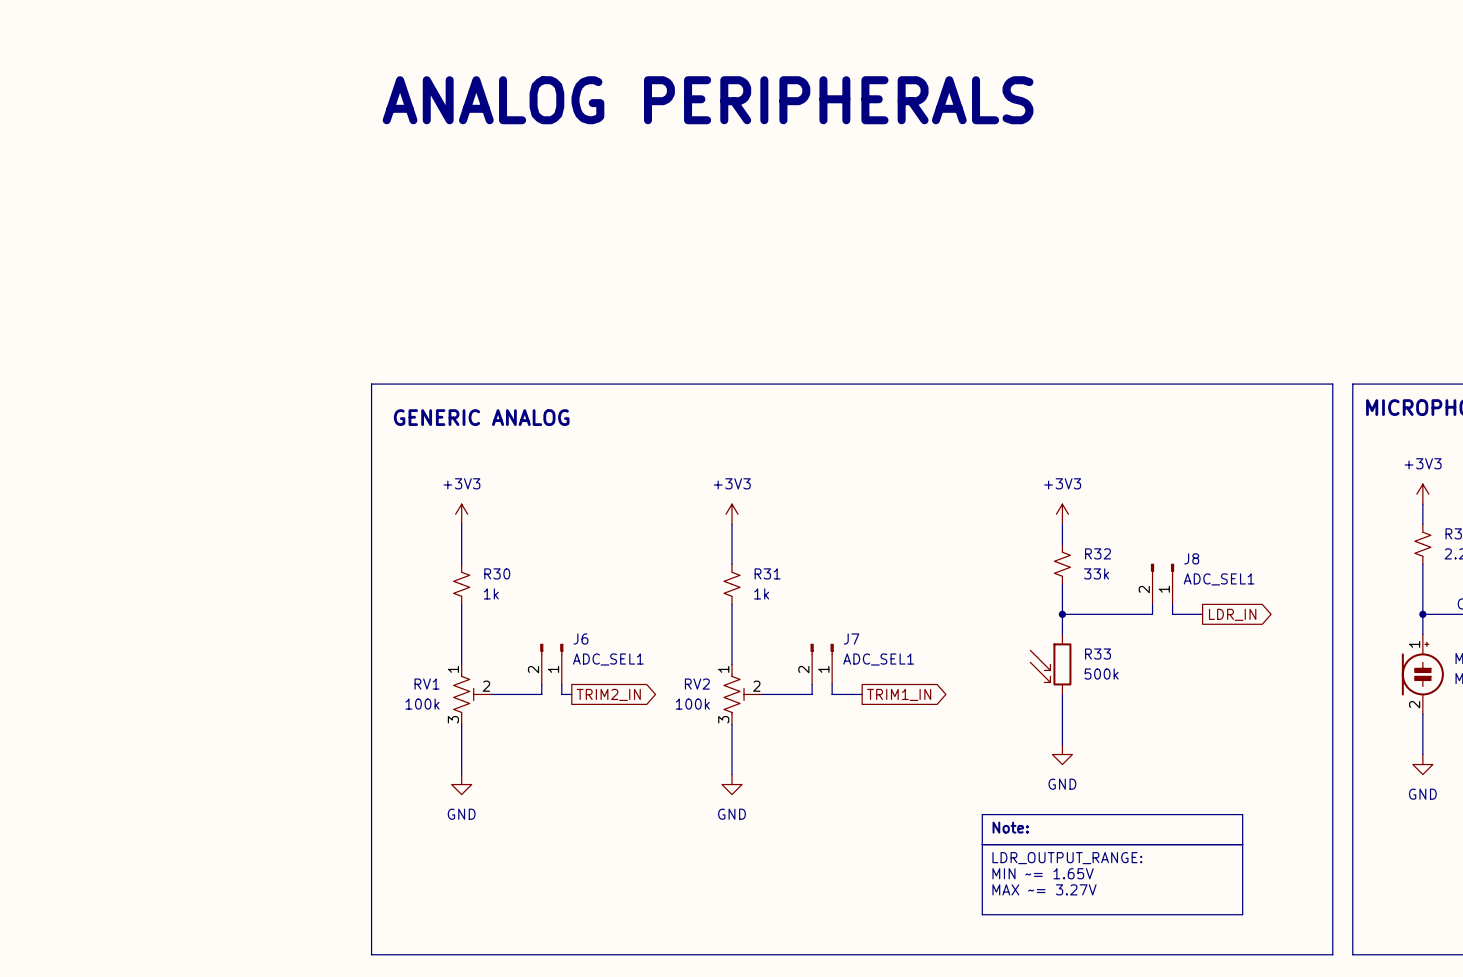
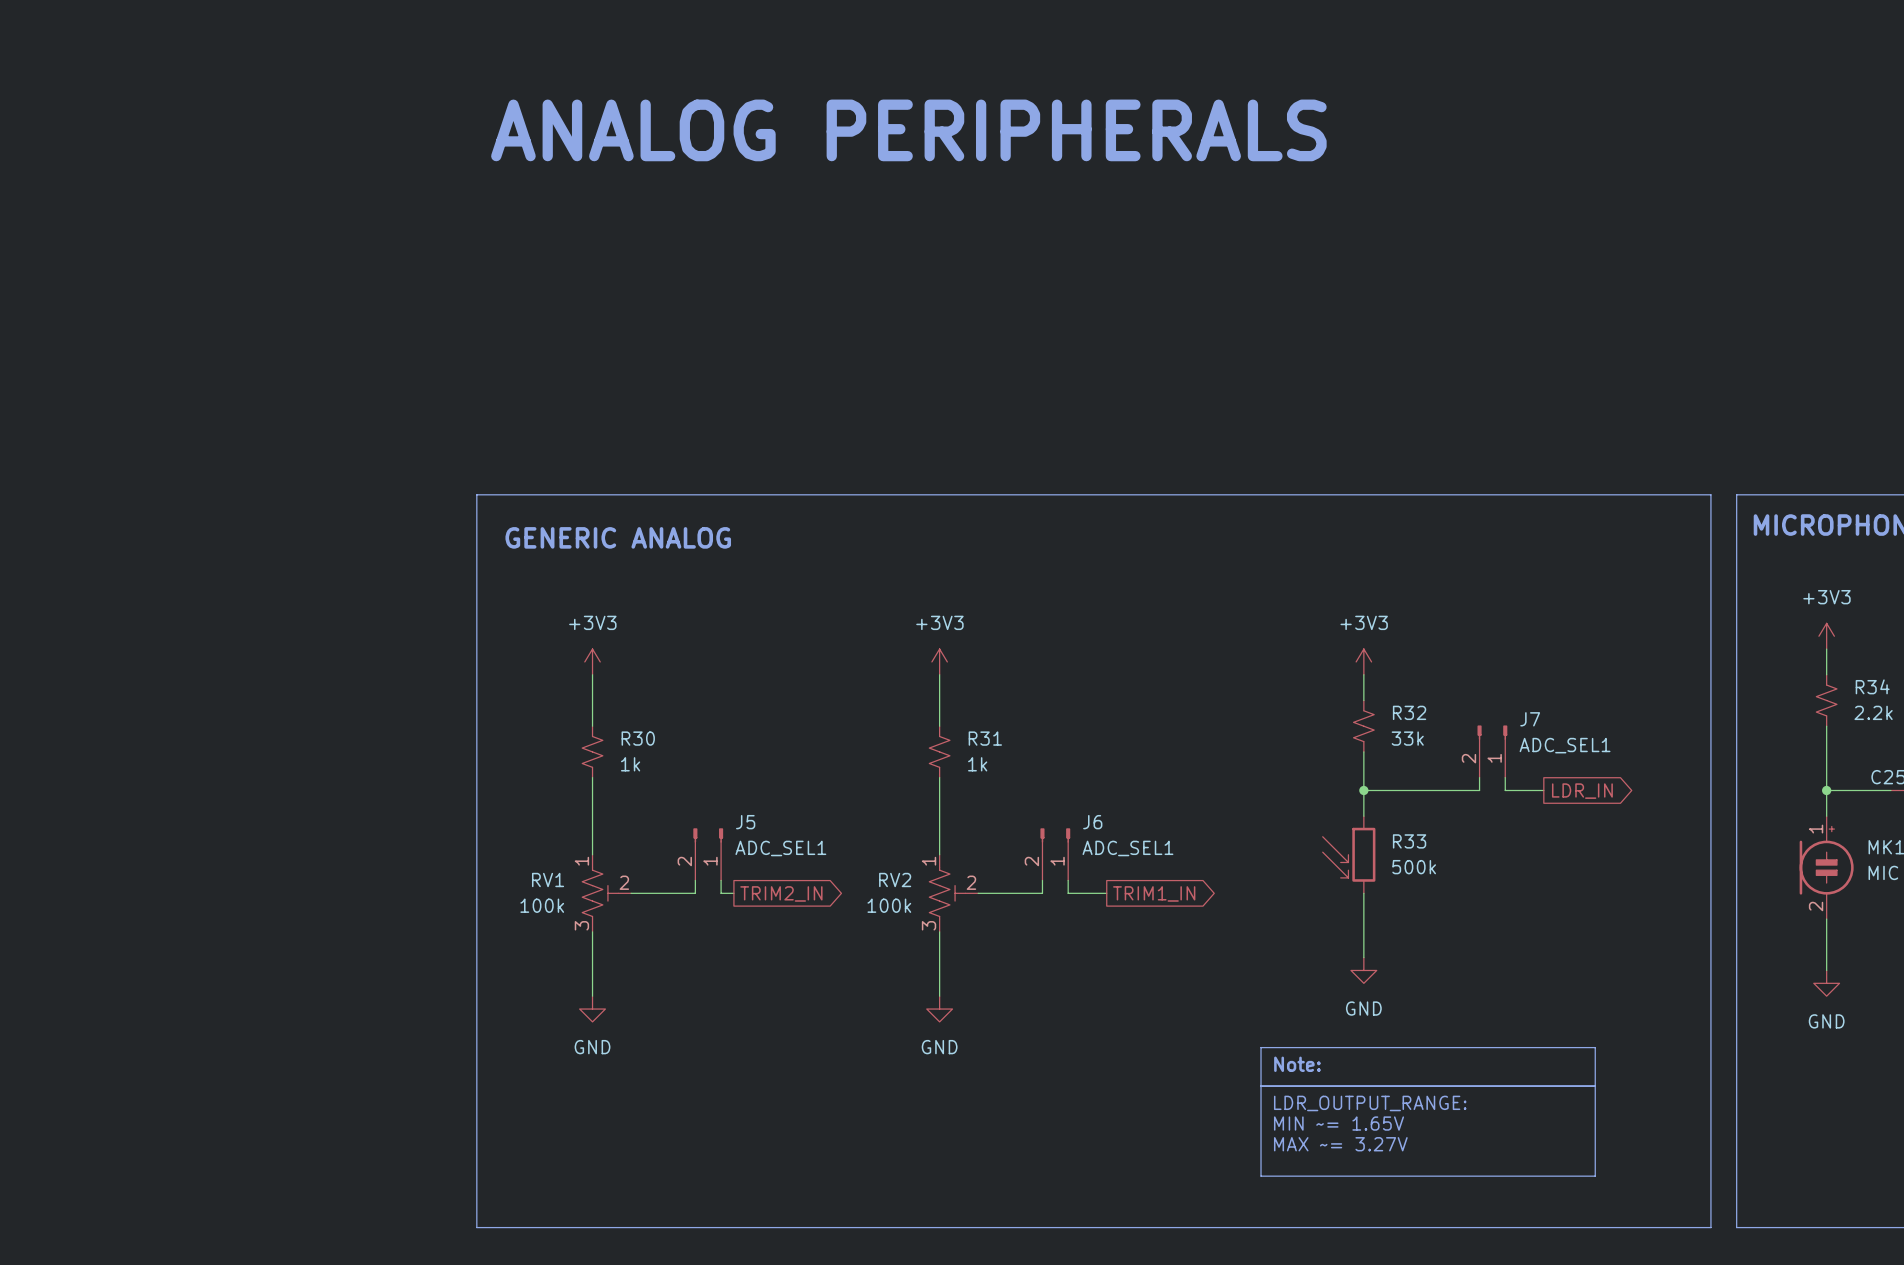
J8 name: J8 (1191, 558) -> J7 (1530, 719)
J6 name: J6 (580, 639) -> J5 (745, 822)
J7 name: J7 (851, 639) -> J6 (1092, 822)

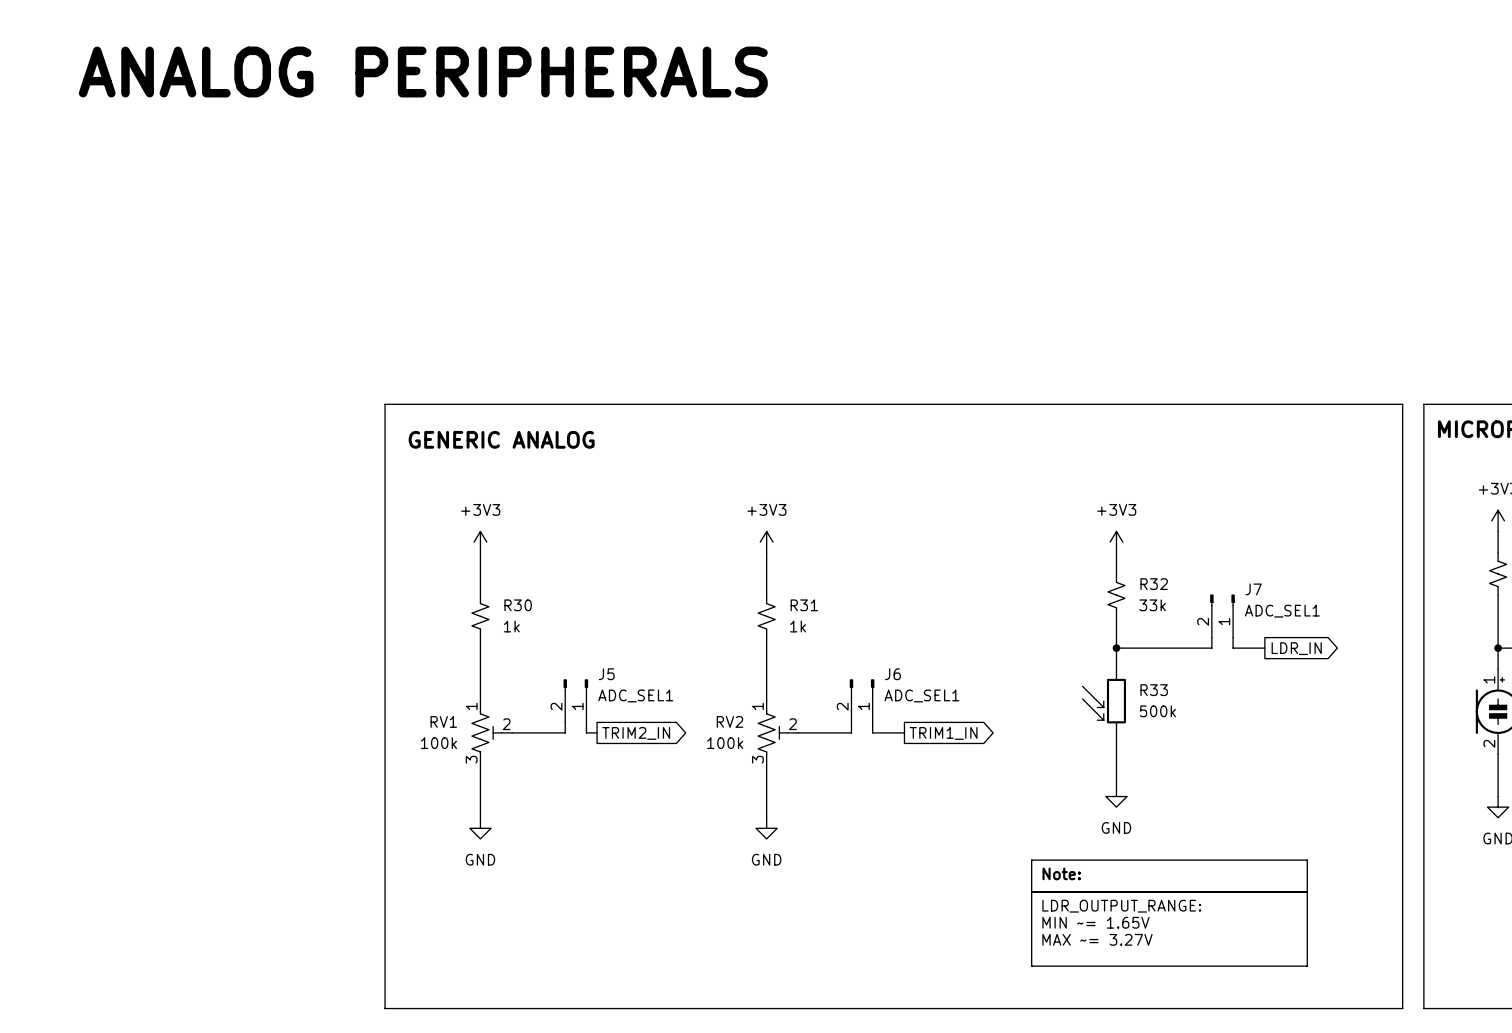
text: none -> ANALOG PERIPHERALS (423, 72)
text: ANALOG PERIPHERALS (908, 130) -> none

